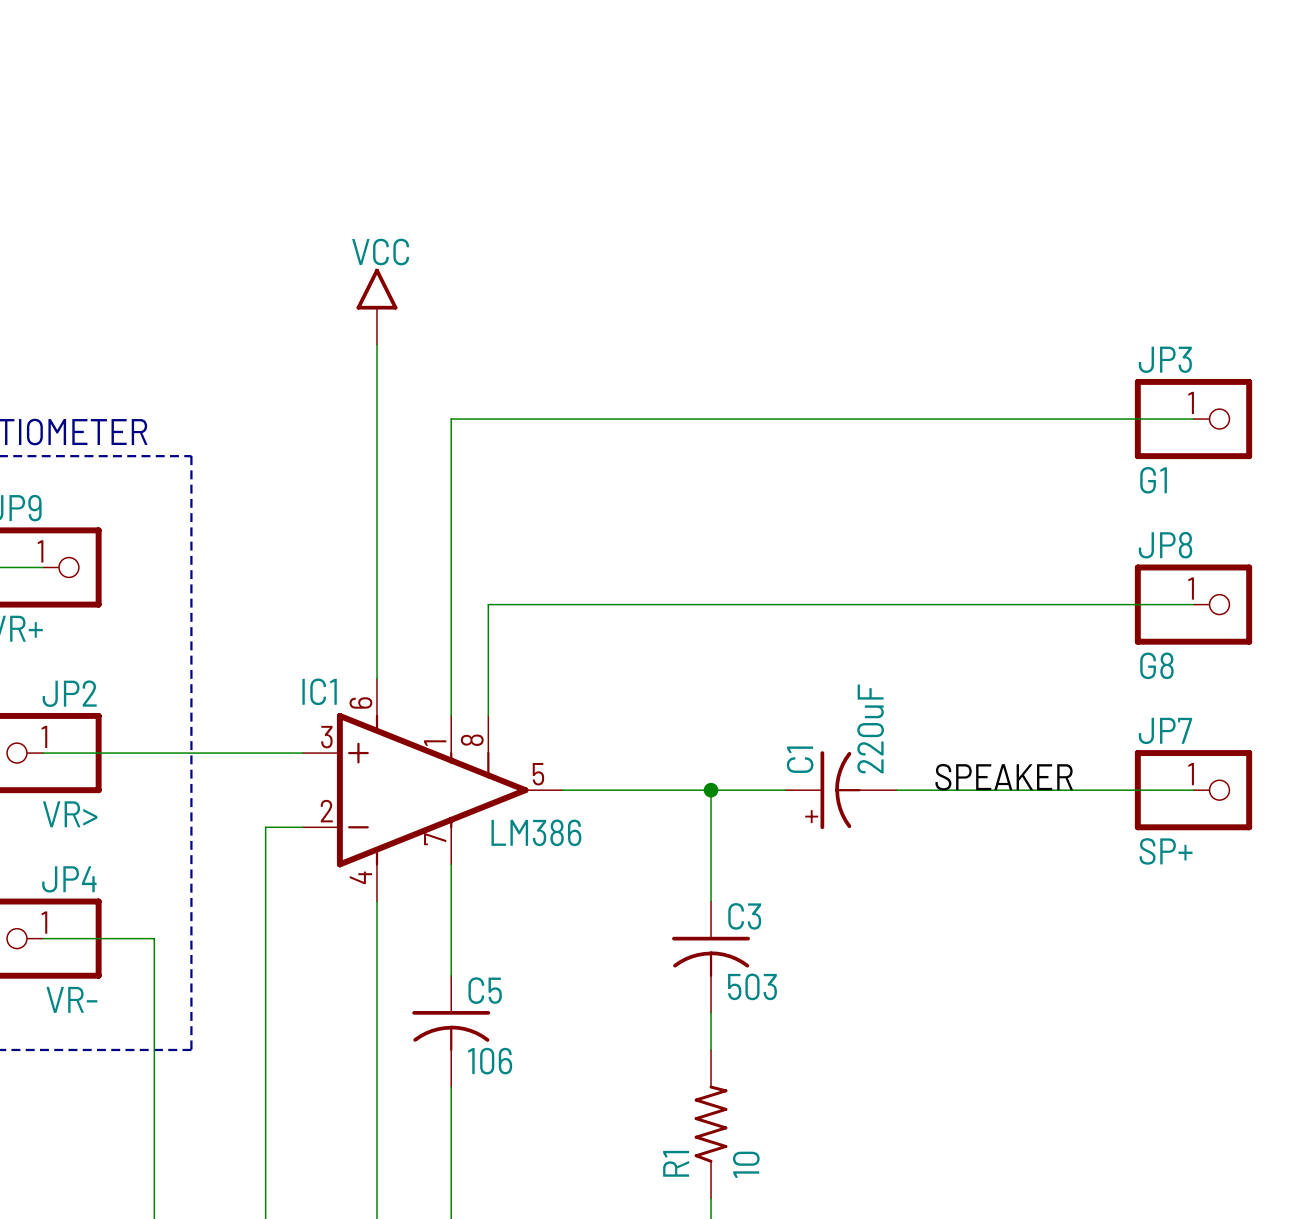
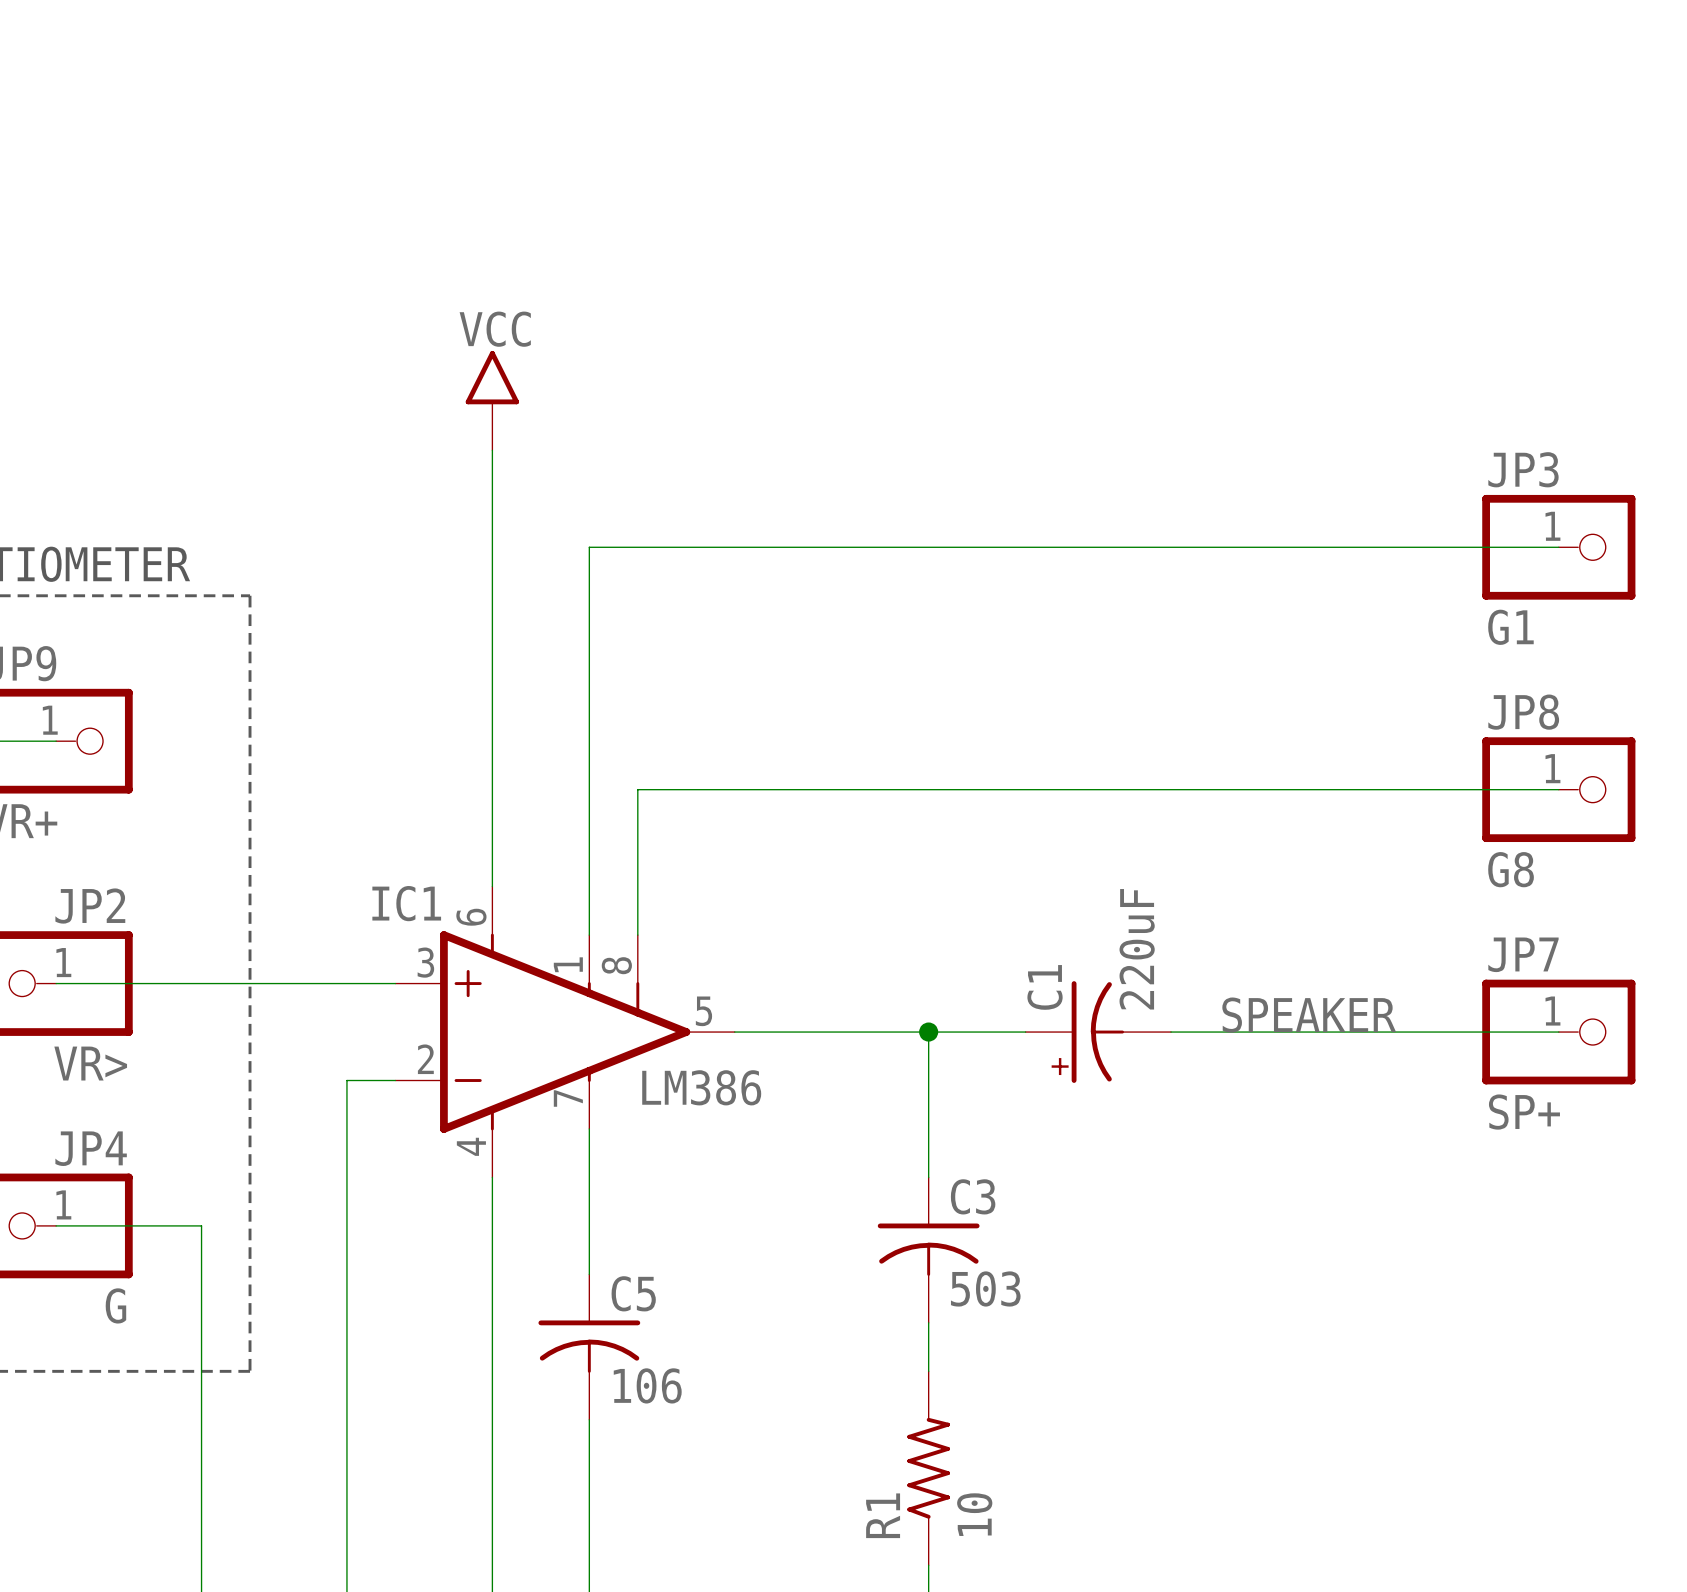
JP4 value: VR- (71, 999) -> G (115, 1305)

